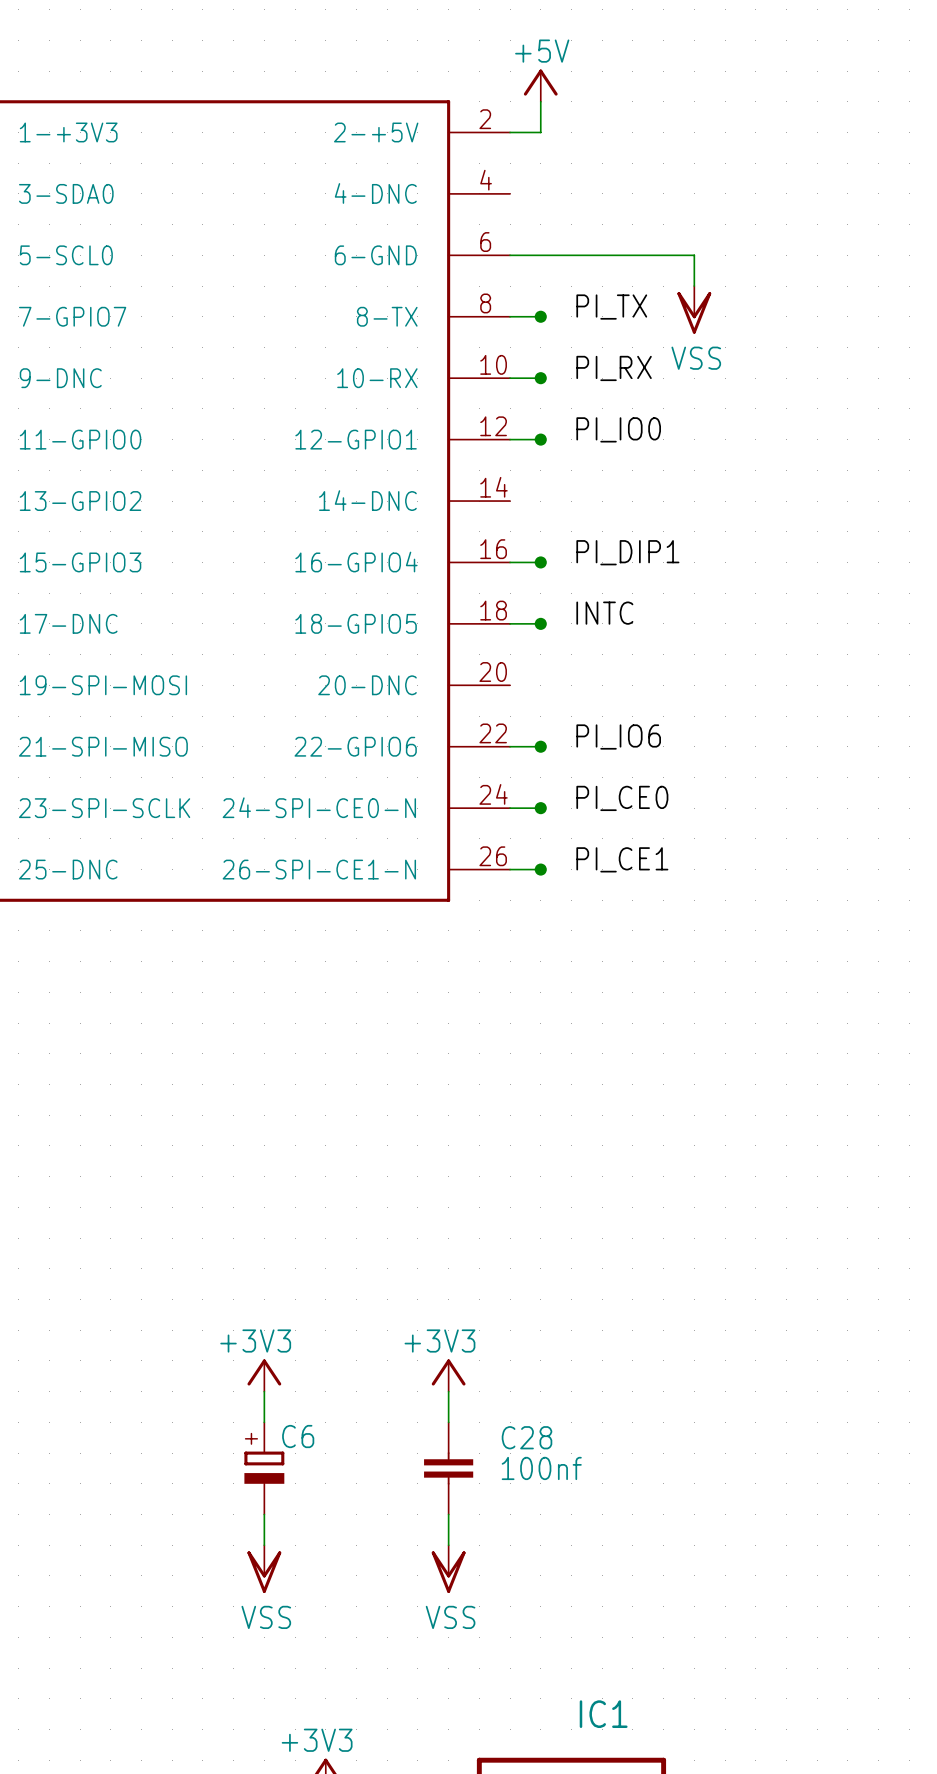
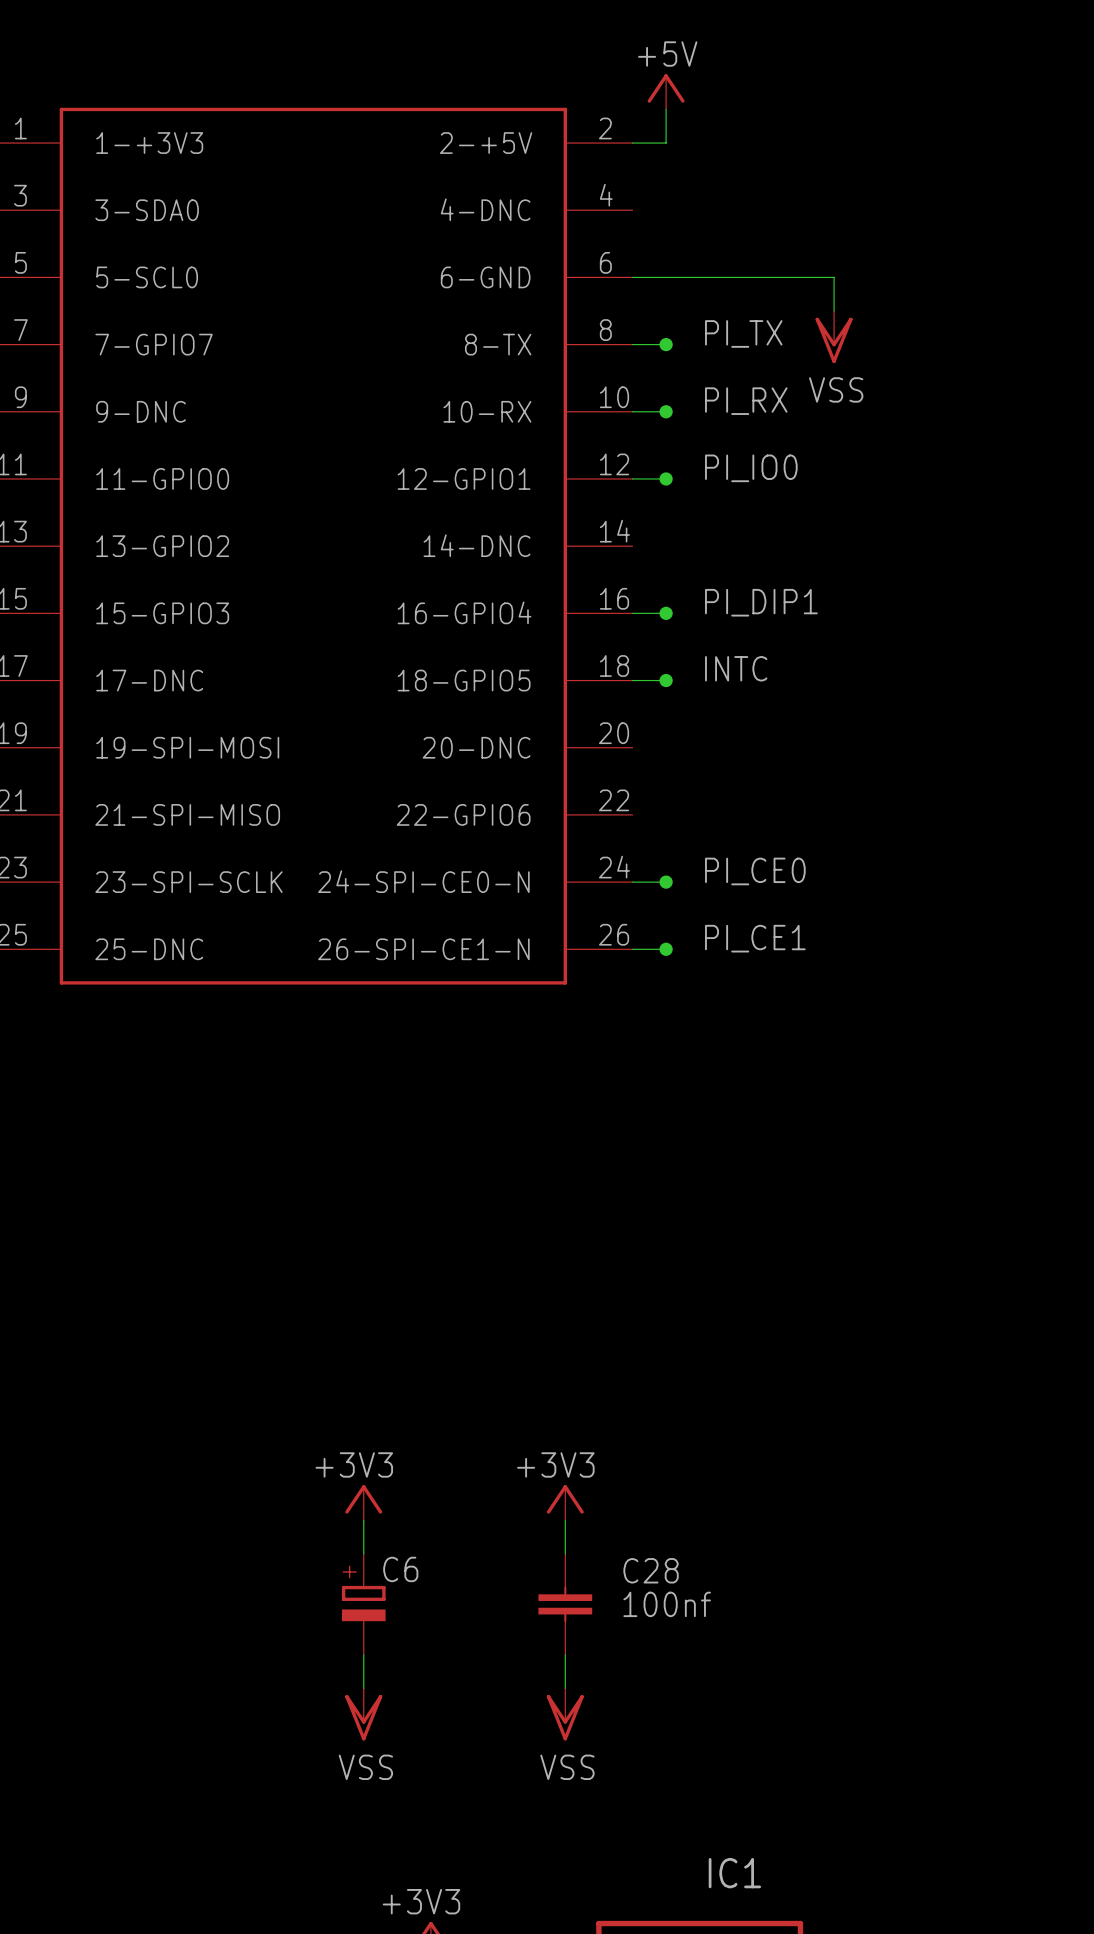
label: PI_IO6 (618, 737) -> none
wire: (510, 746) (540, 746) -> none
junction: (540, 746) -> none

